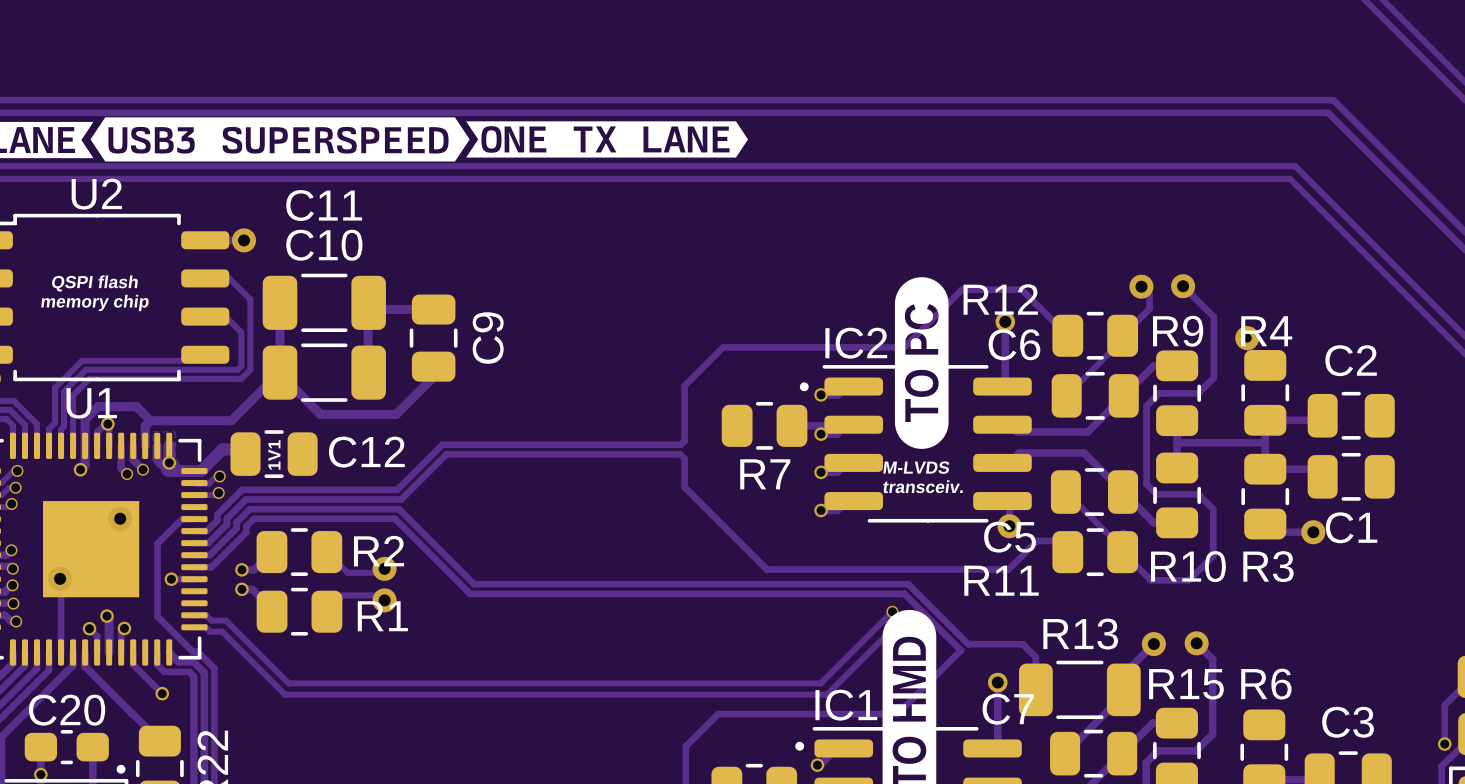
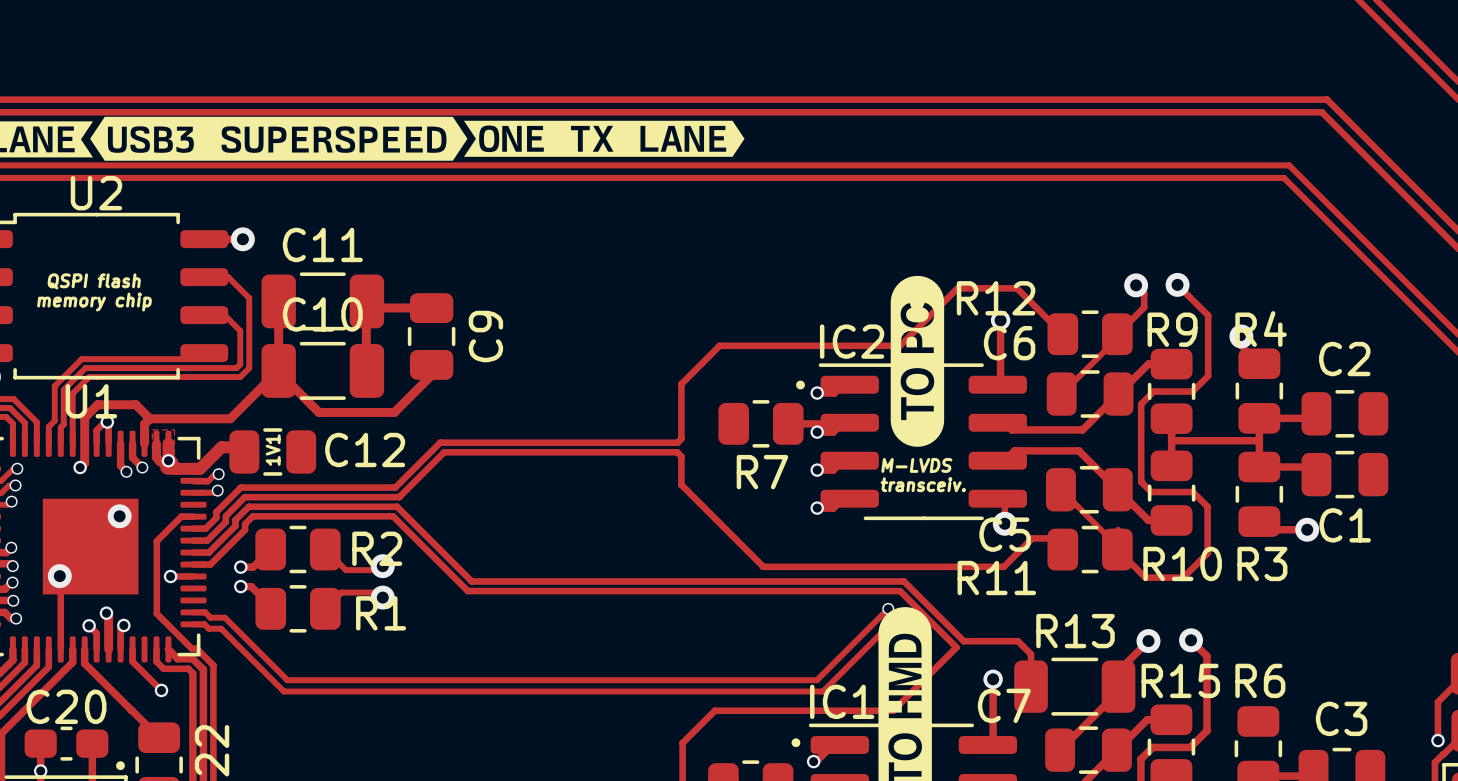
C11 name position: C11 (324, 205) -> C11 (322, 244)
C10 name position: C10 (324, 245) -> C10 (322, 314)

